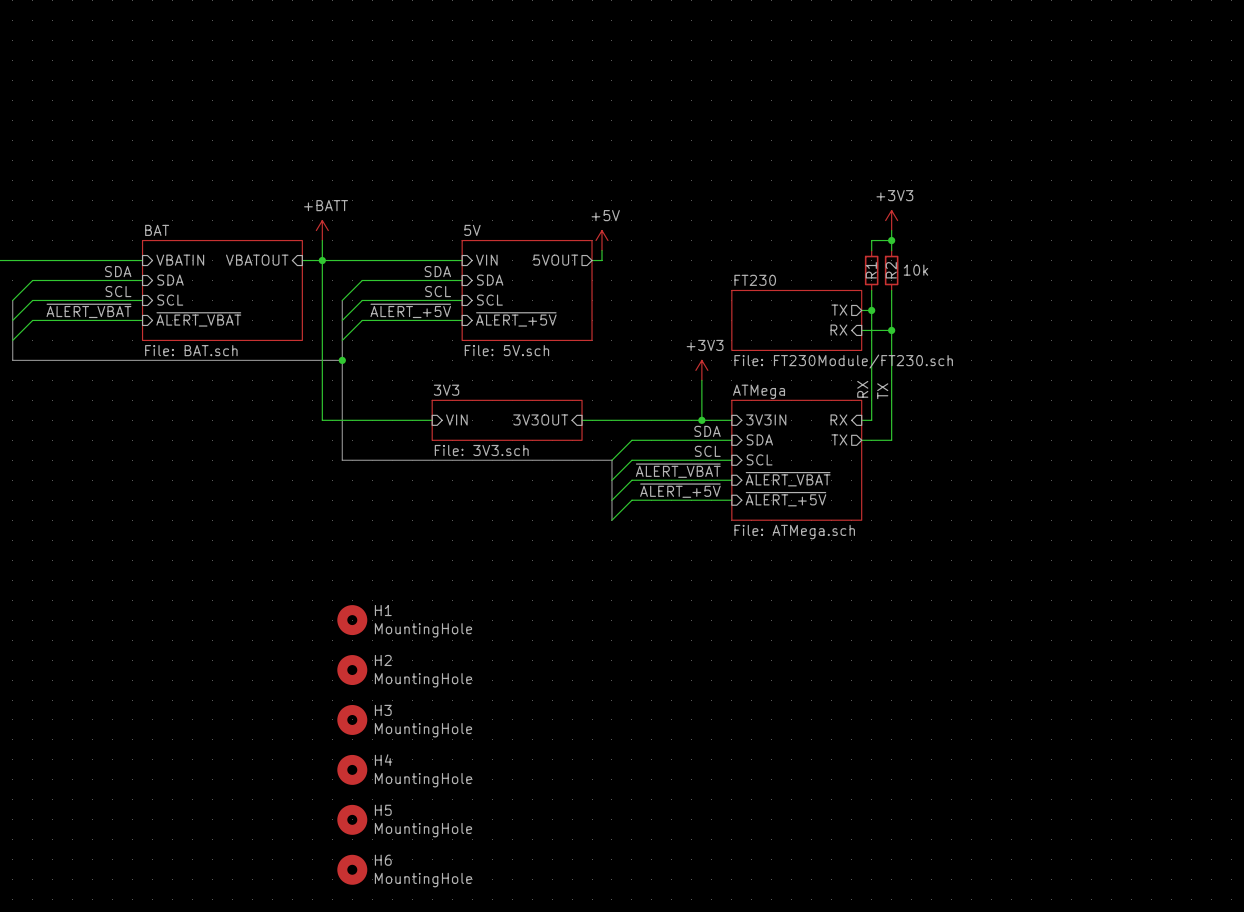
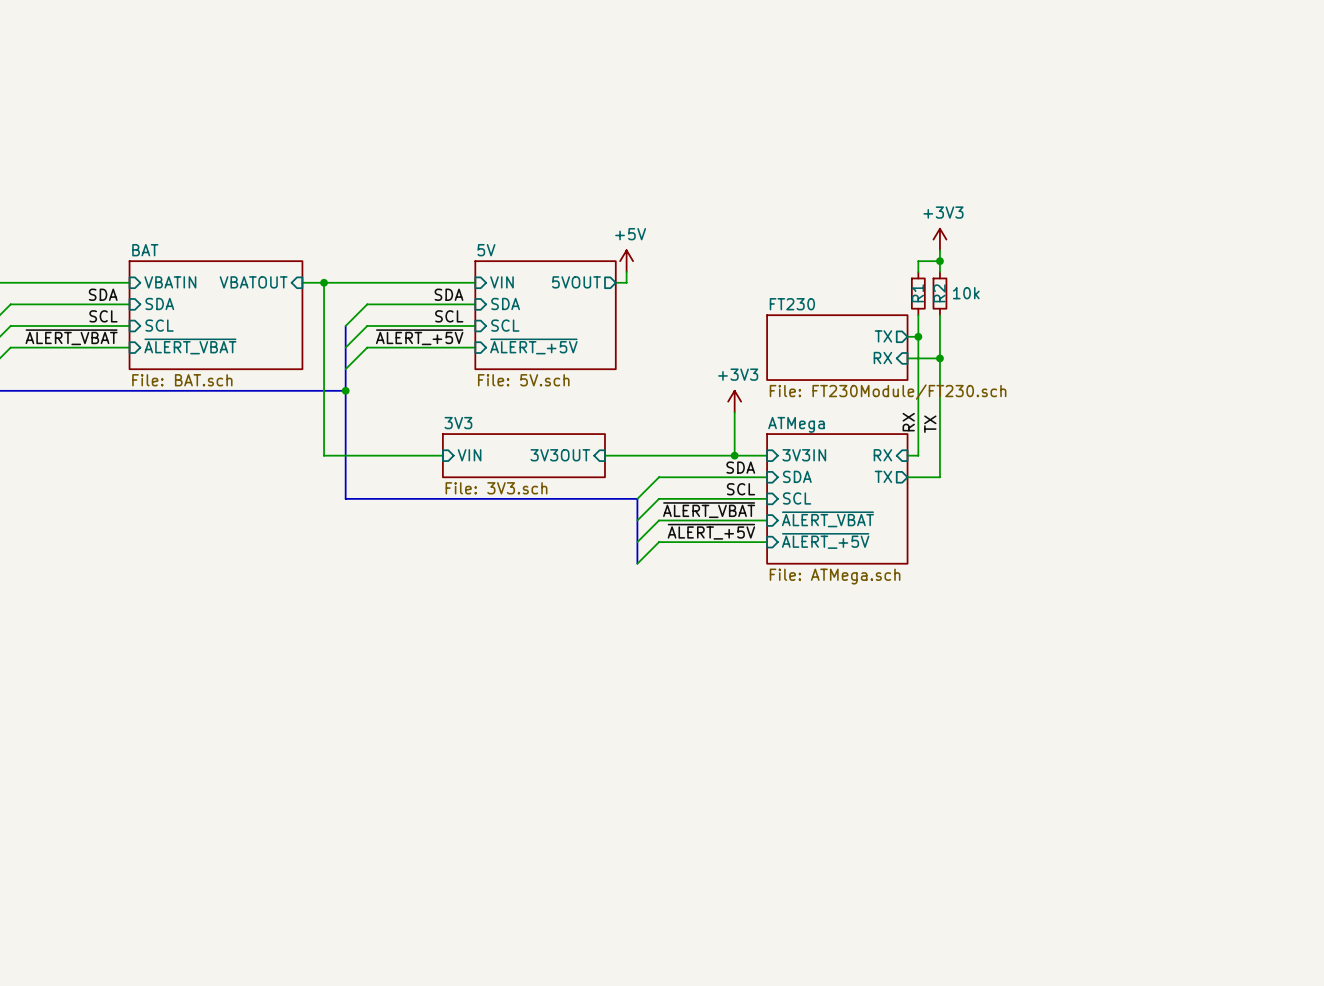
power symbol: +BATT (322, 230) -> none
wire: (322, 240) (322, 260) -> none
H1: MountingHole (352, 620) -> none
H2: MountingHole (352, 670) -> none
H3: MountingHole (352, 719) -> none
H4: MountingHole (352, 769) -> none
H5: MountingHole (352, 819) -> none
H6: MountingHole (352, 869) -> none

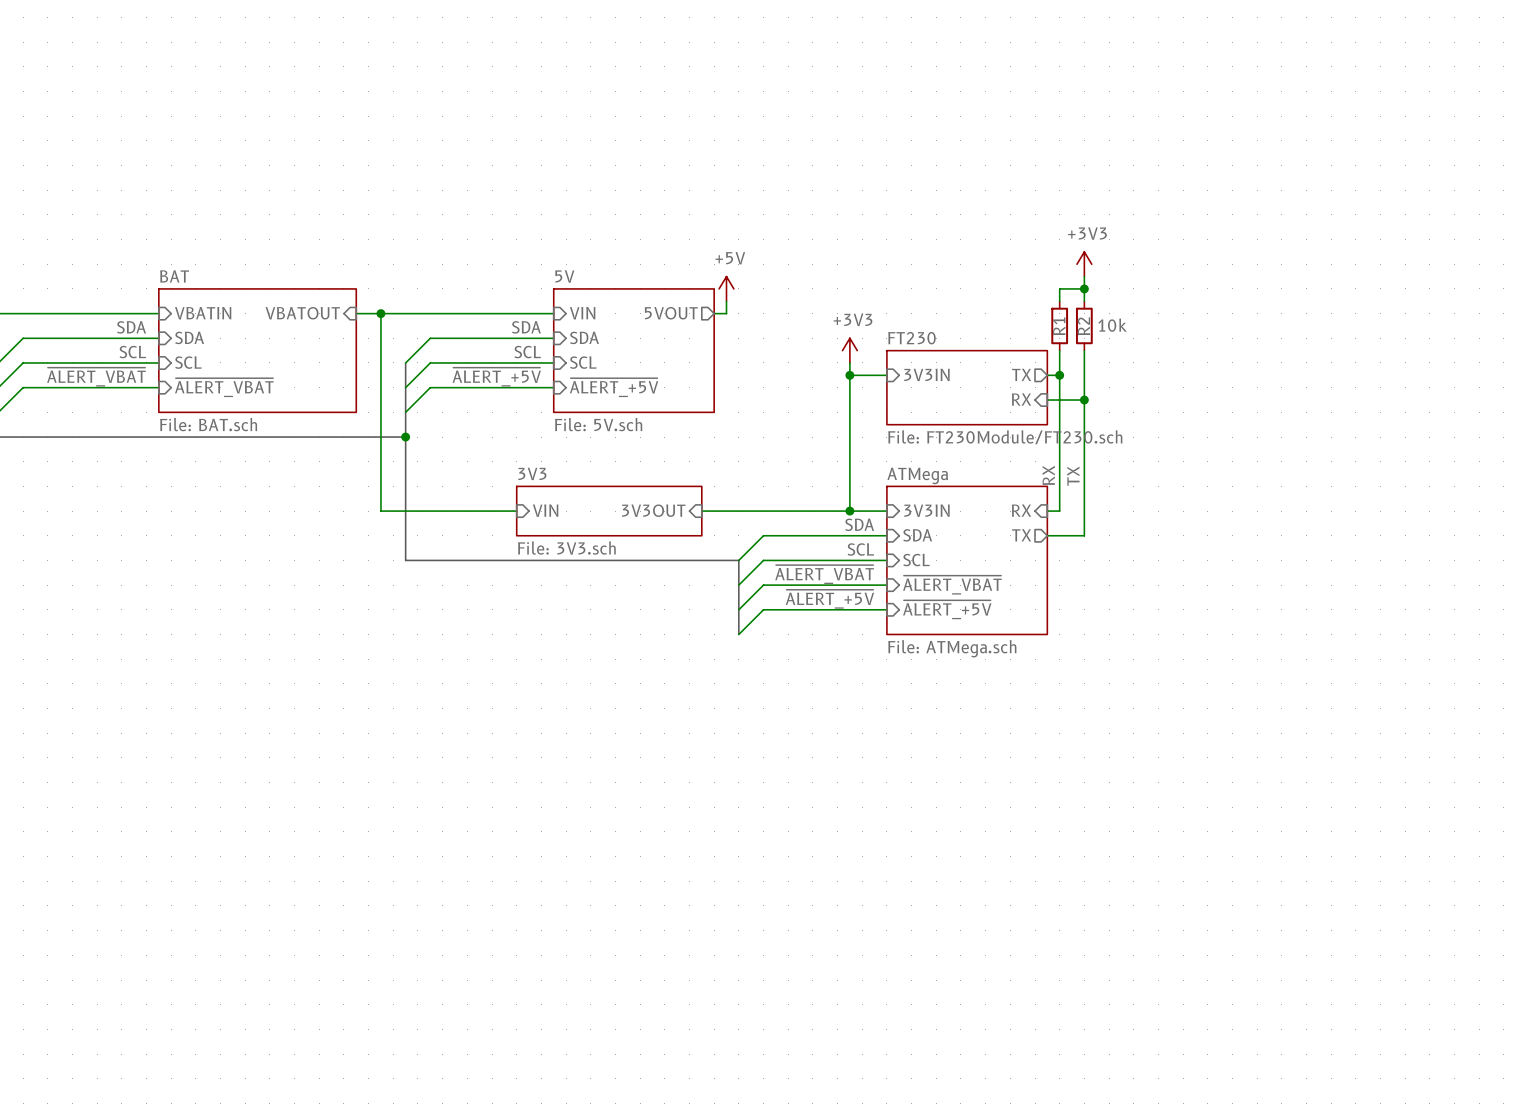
wire: none -> (849, 362) (849, 461)
wire: none -> (849, 375) (886, 375)
junction: none -> (849, 375)
sheet pin: none -> 3V3IN (926, 374)
power symbol position: +3V3 (734, 401) -> +3V3 (849, 350)

